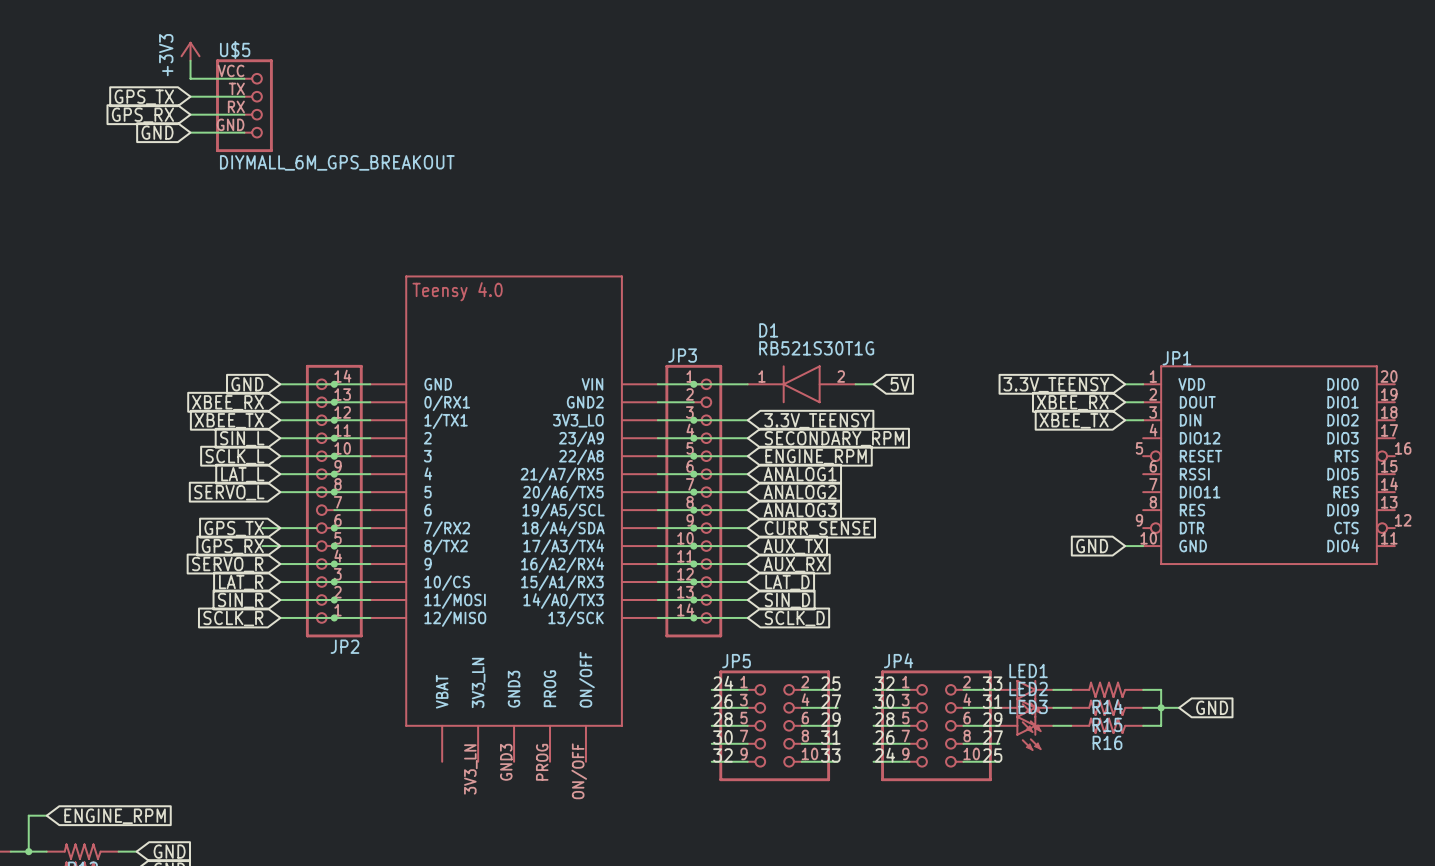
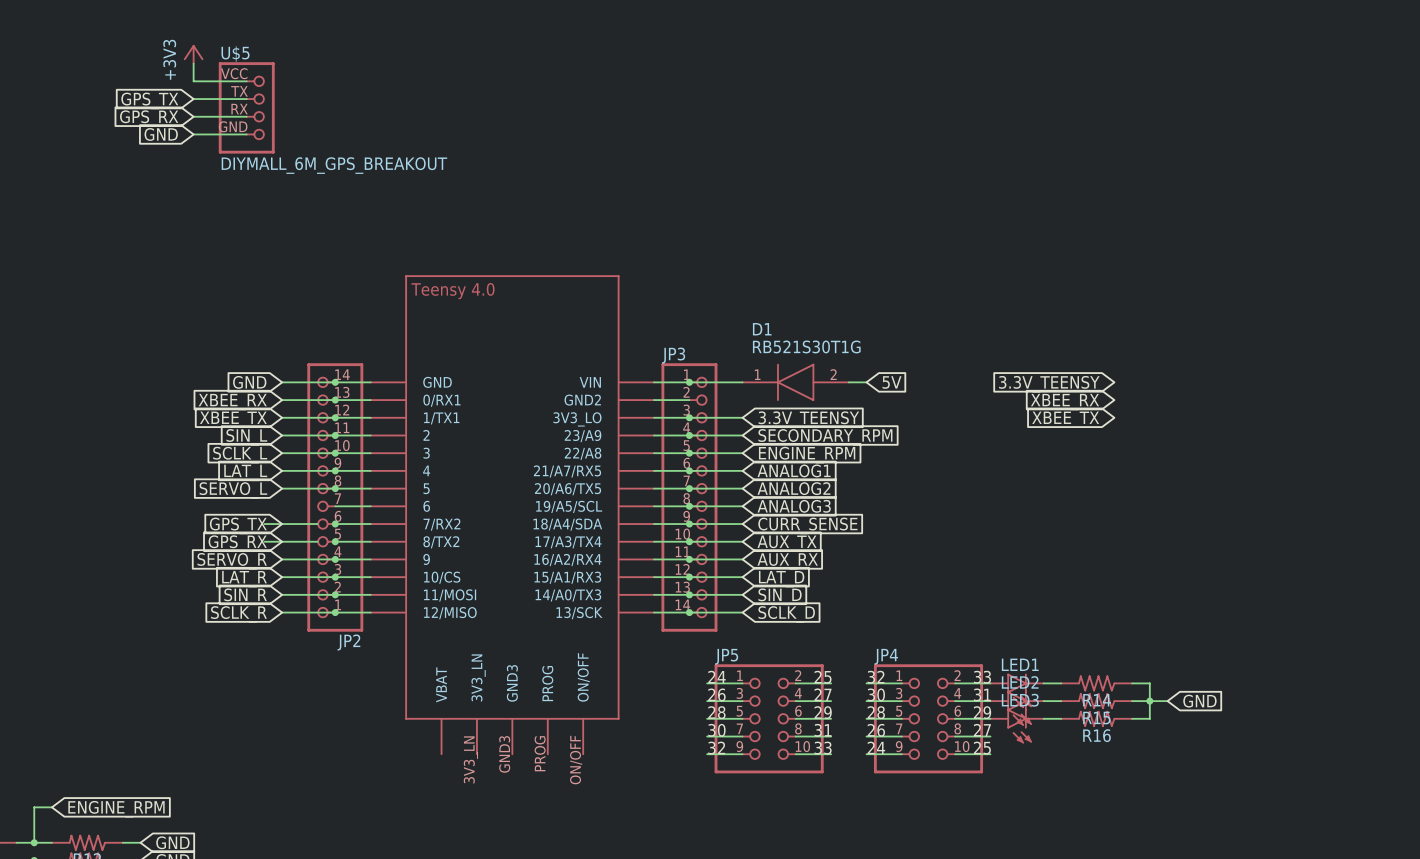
wire: (1125, 384) (1143, 384) -> none
wire: (1125, 402) (1143, 402) -> none
wire: (1125, 420) (1143, 420) -> none
JP1: (1268, 465) -> none
global label: GND (1092, 546) -> none
wire: (1125, 546) (1143, 546) -> none

